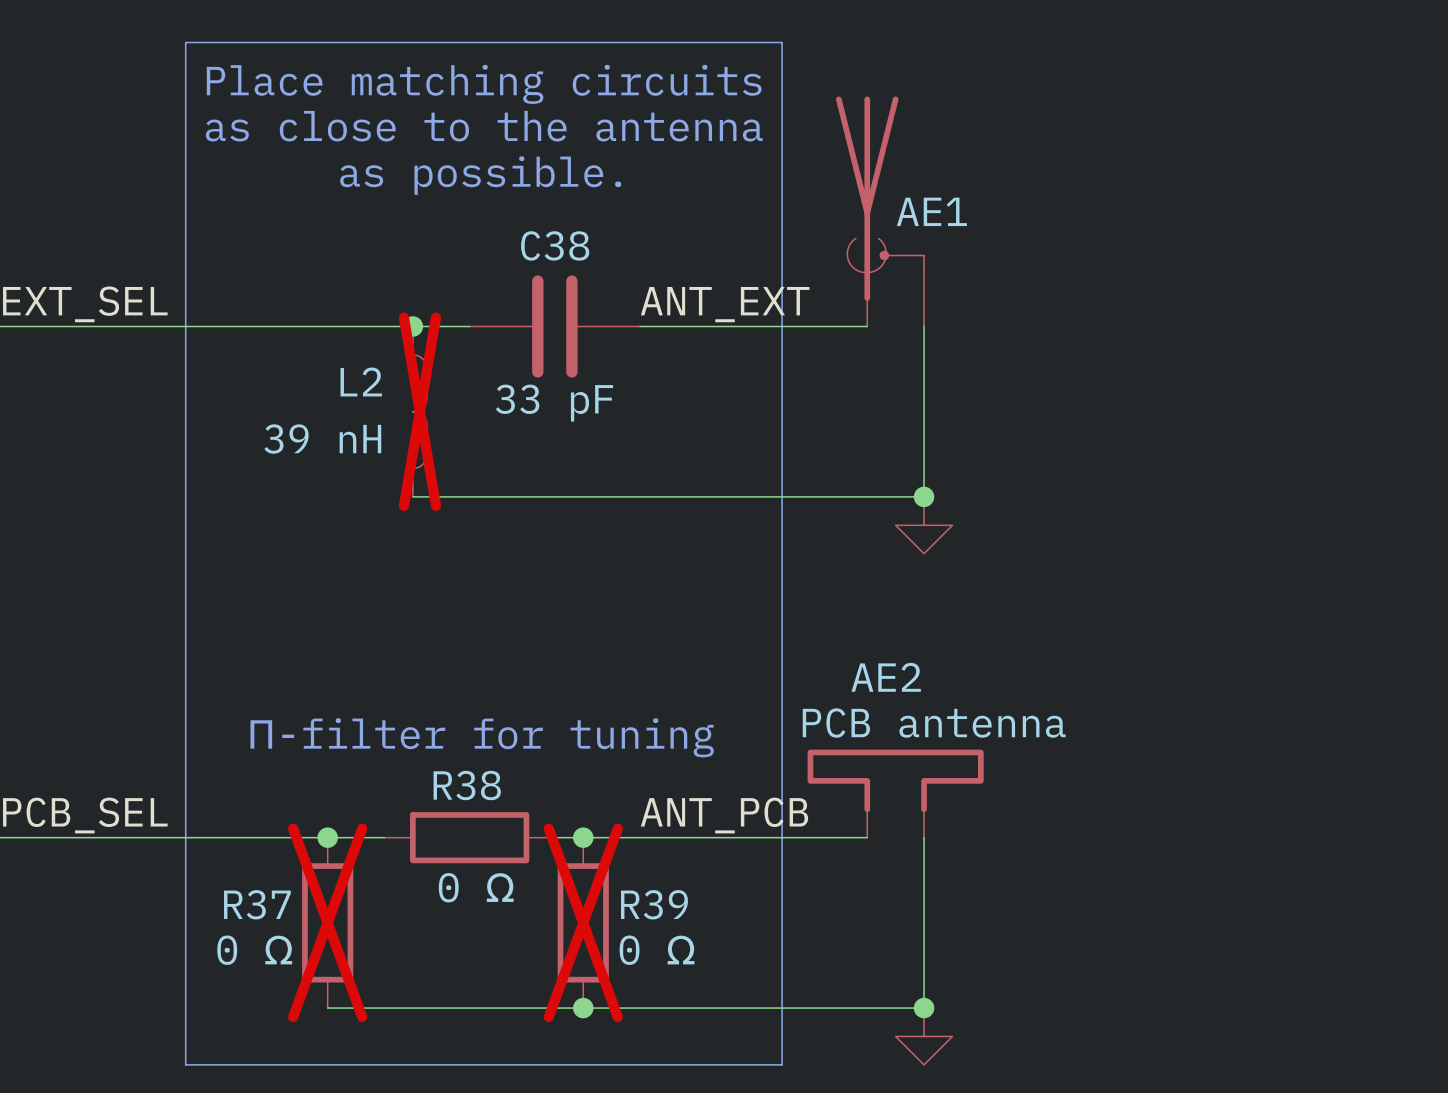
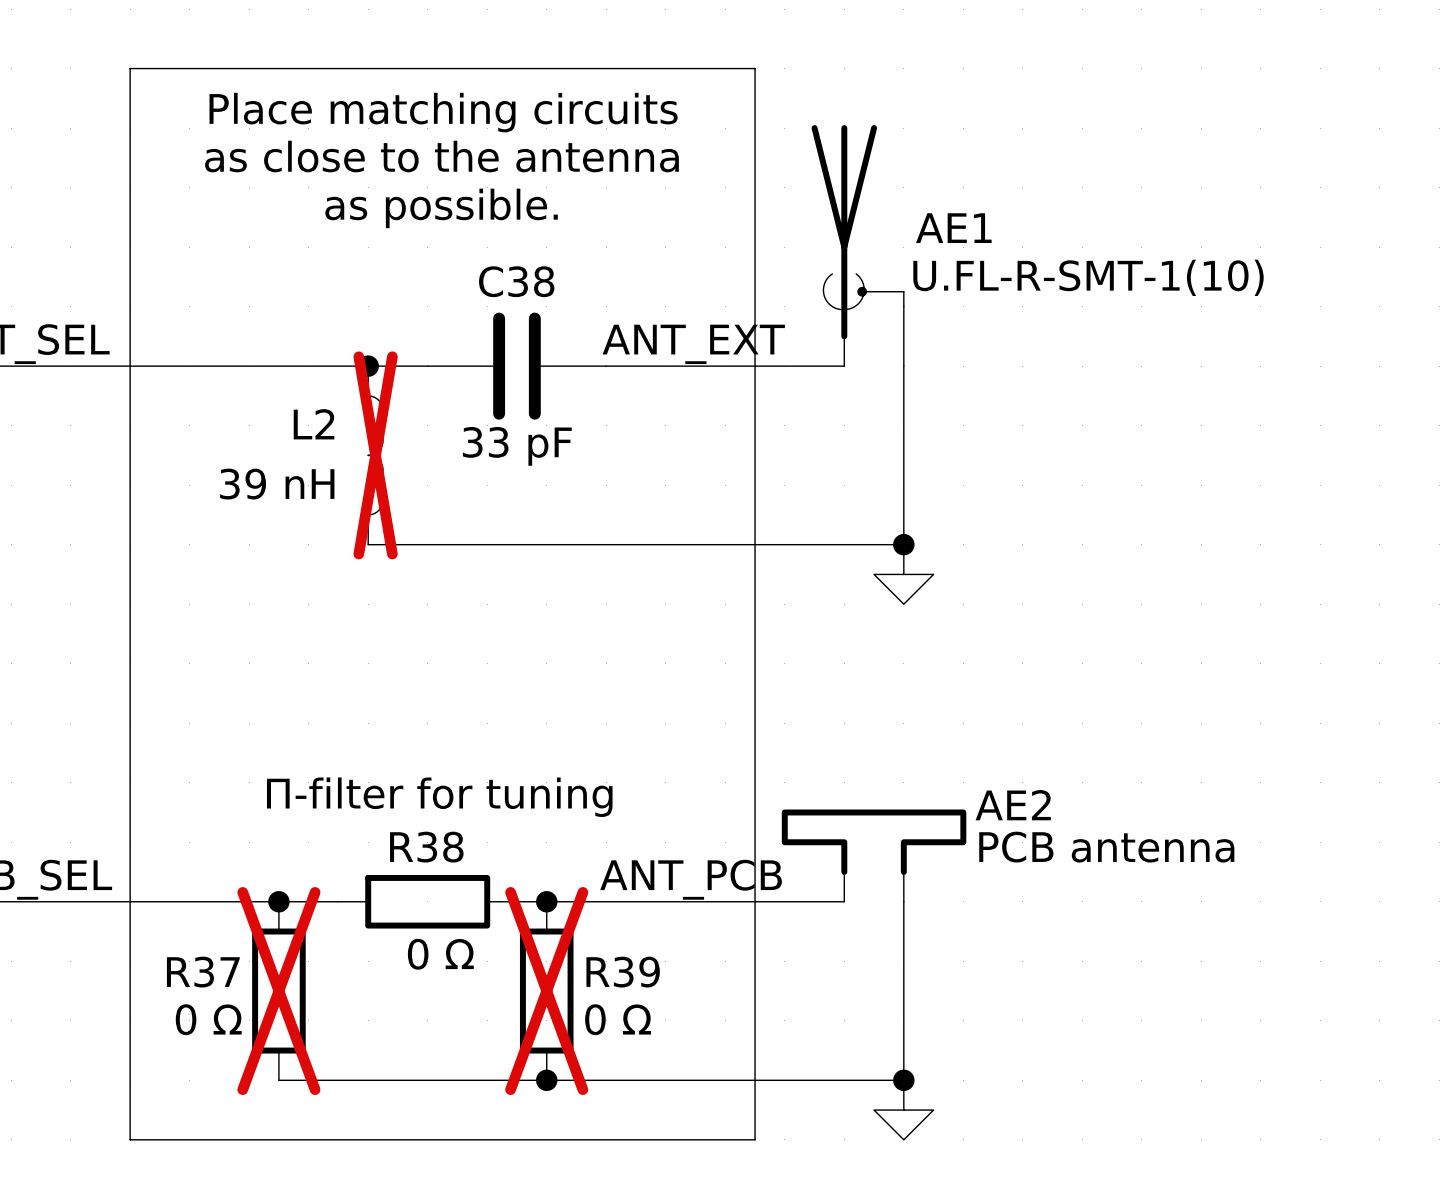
AE1 name position: AE1 (931, 211) -> AE1 (953, 228)
AE1 value: none -> U.FL-R-SMT-1(10) (1088, 277)
AE2 name position: AE2 (886, 677) -> AE2 (1013, 805)
AE2 value position: PCB antenna (934, 723) -> PCB antenna (1106, 847)

